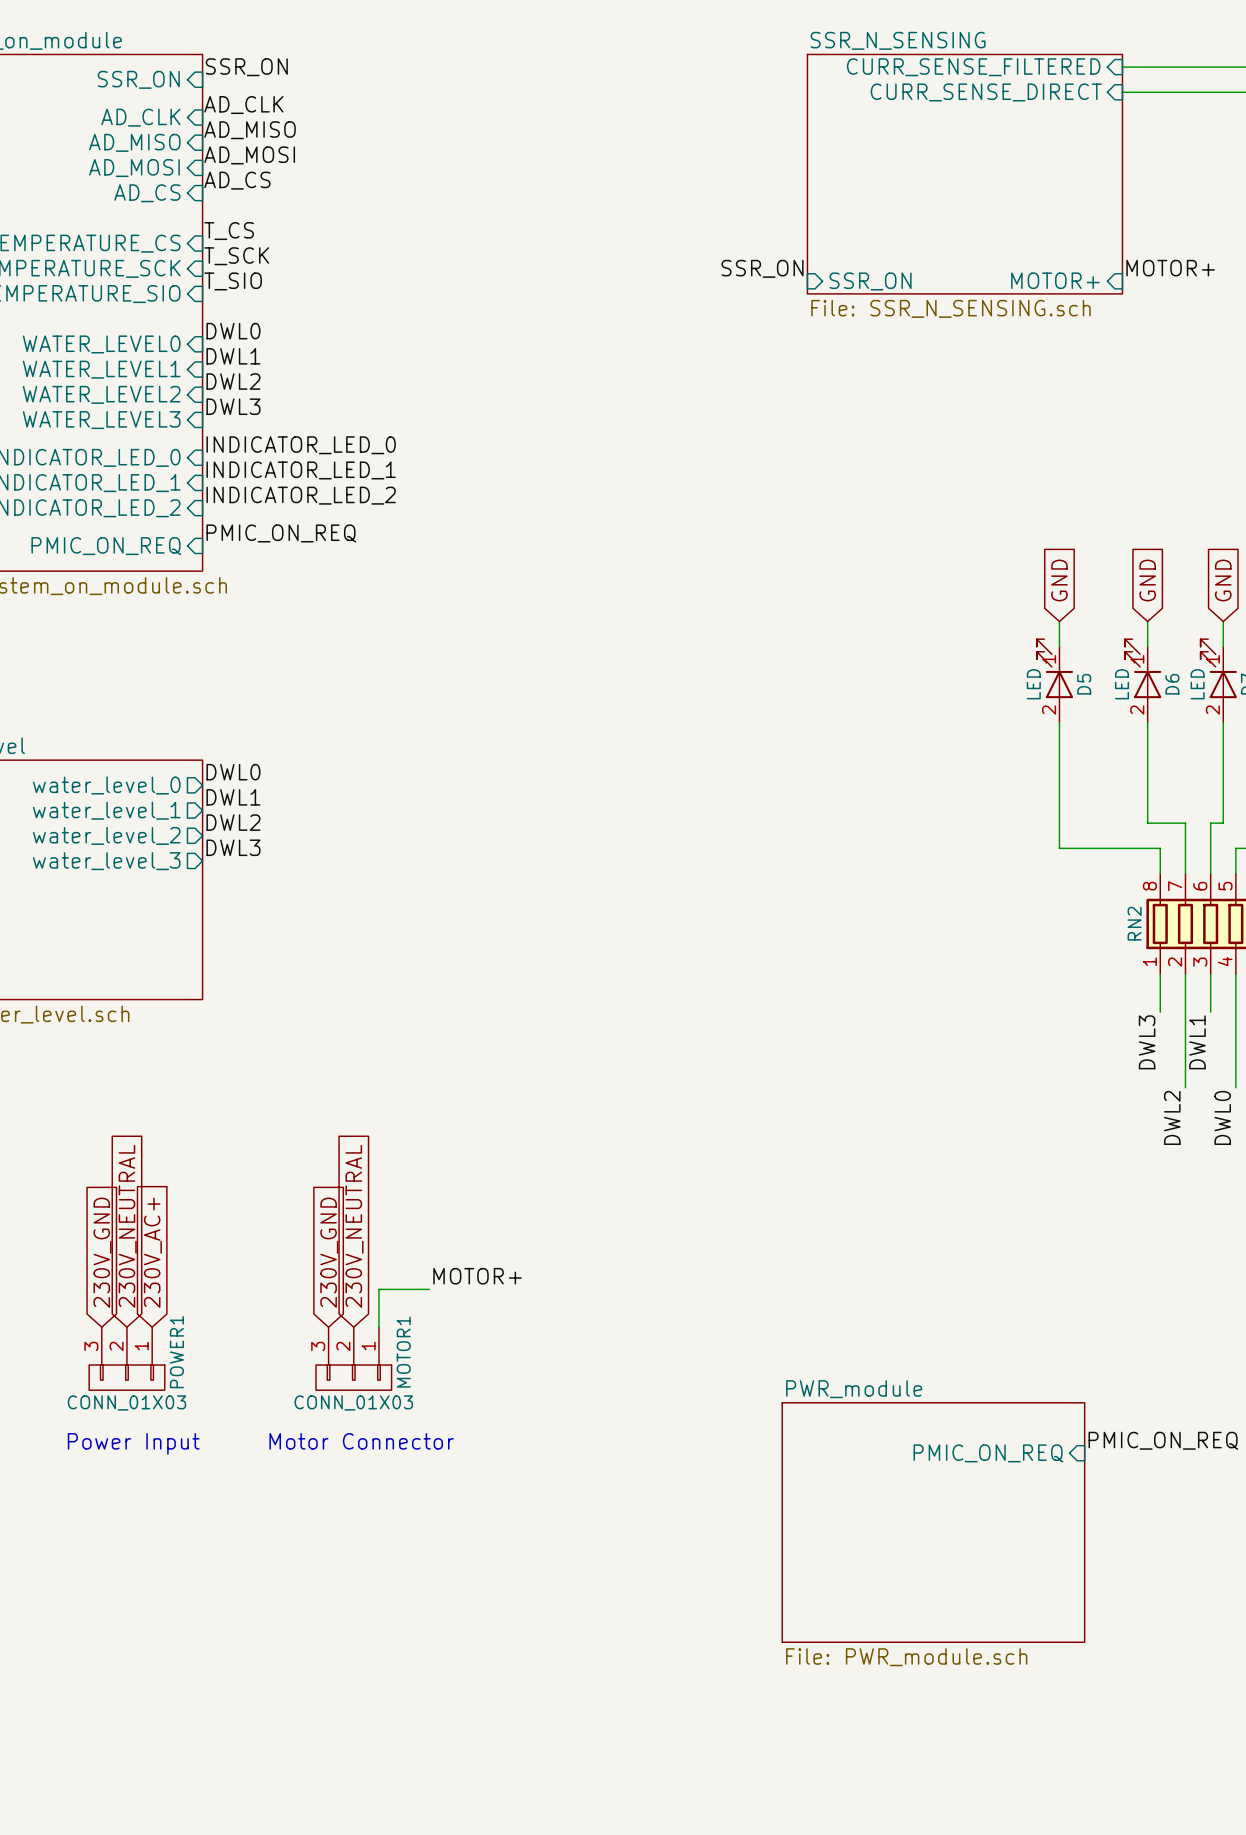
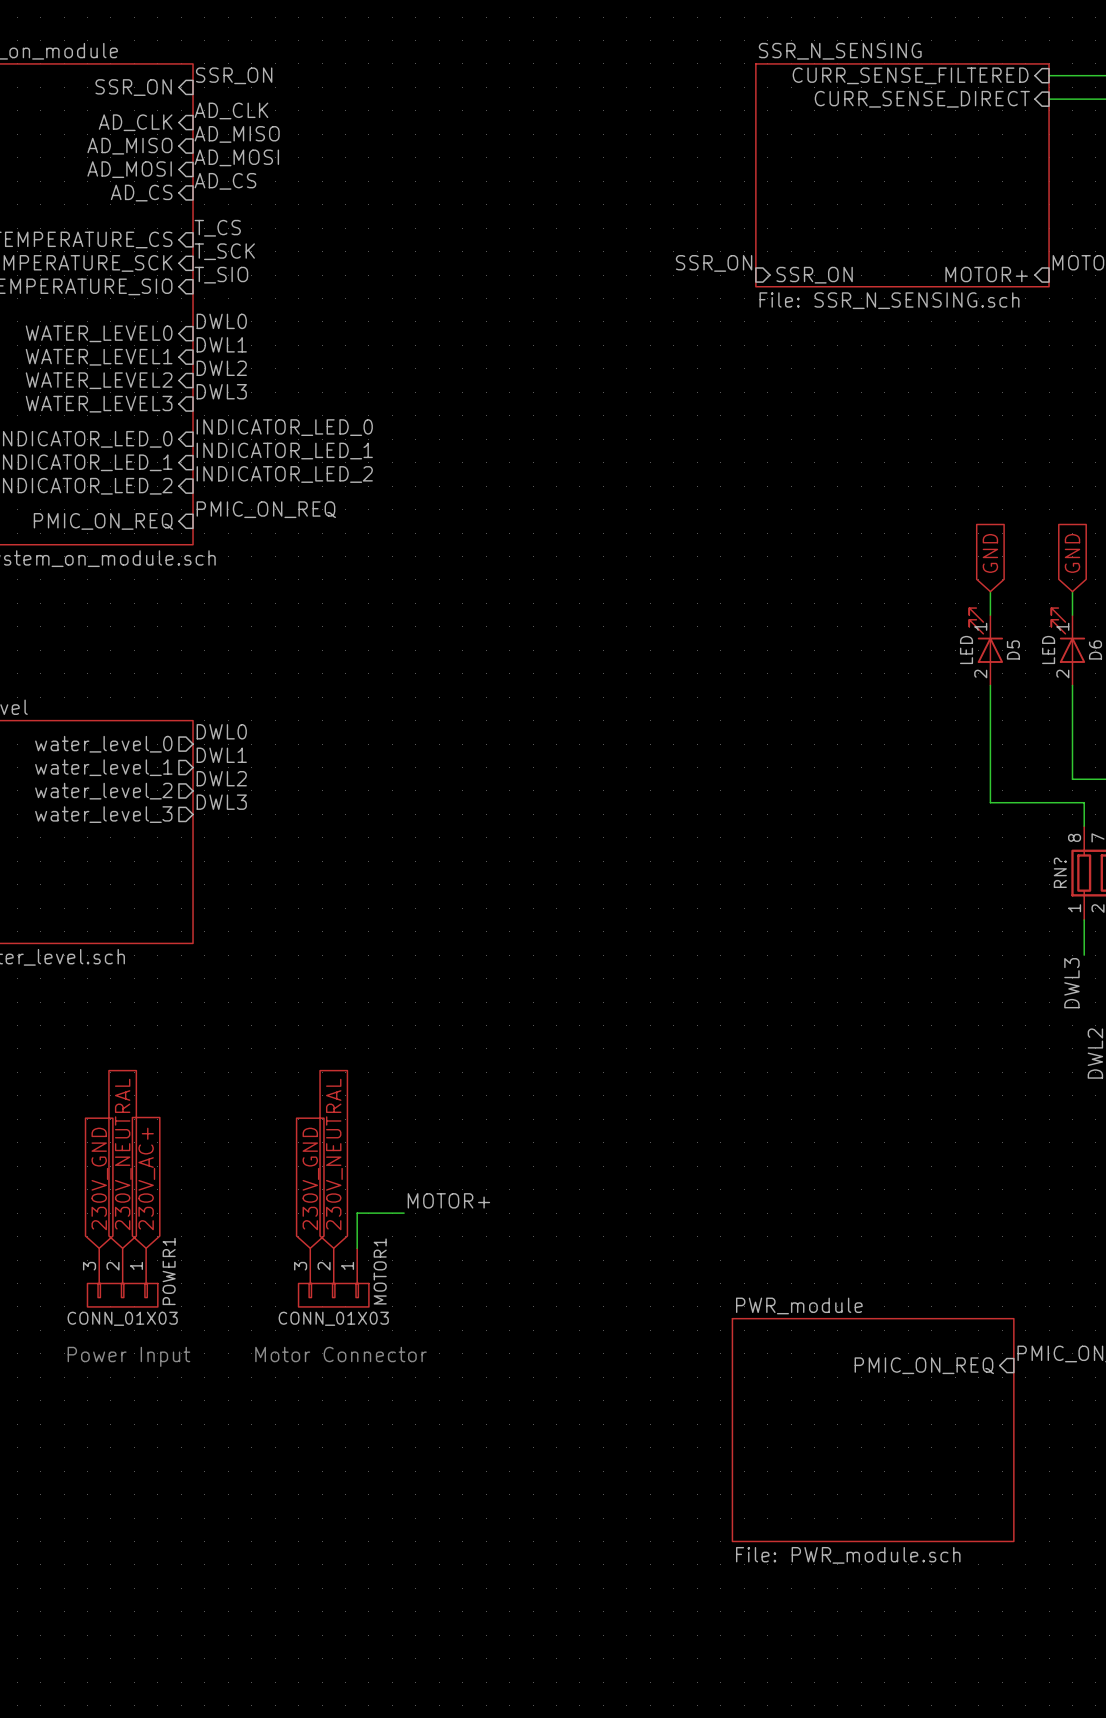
RN2 name: RN2 (1134, 923) -> RN? (1060, 872)

